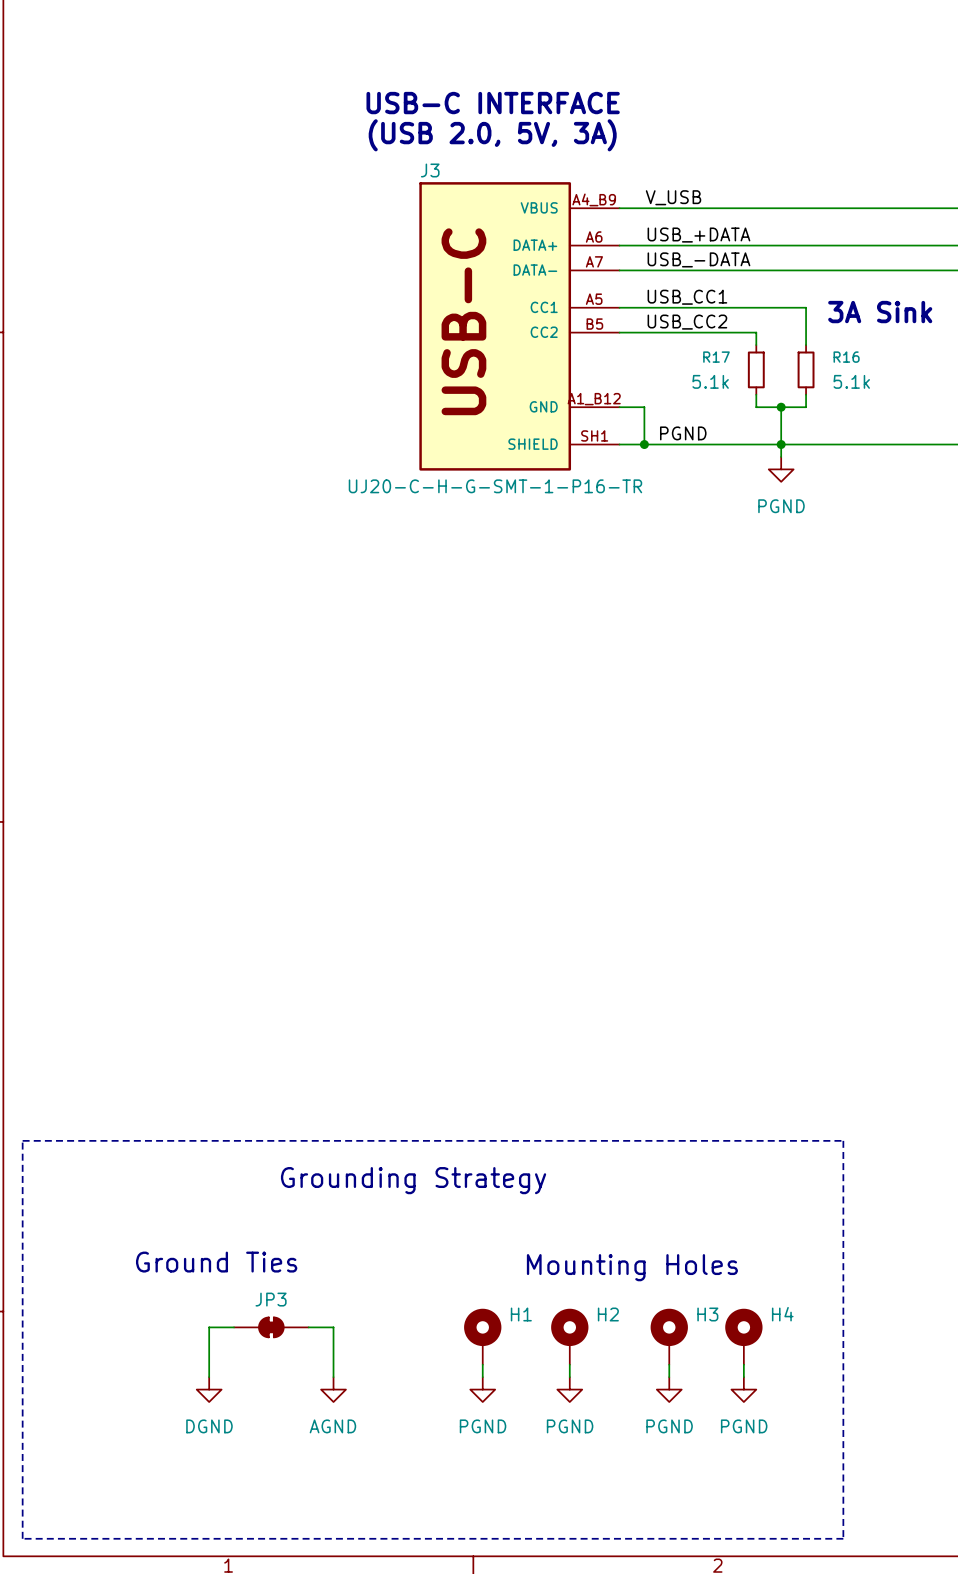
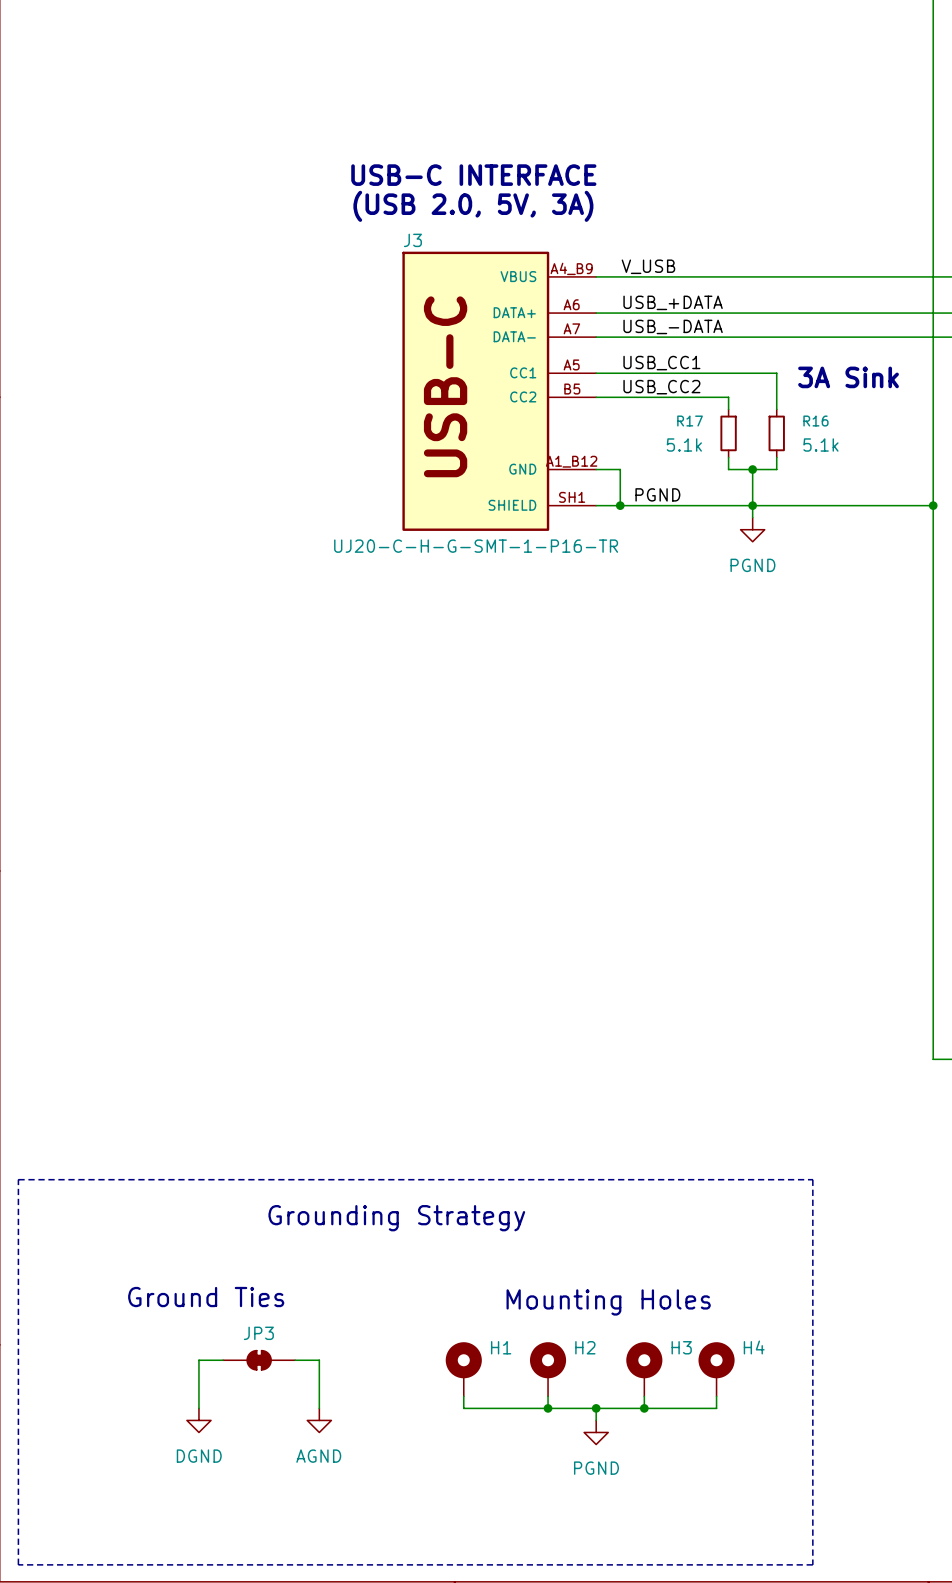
wire: none -> (463, 1408) (716, 1408)
junction: none -> (548, 1408)
wire: none -> (596, 1408) (596, 1420)
junction: none -> (596, 1408)
junction: none -> (644, 1408)
power symbol: PGND (482, 1389) -> none
power symbol: PGND (569, 1389) -> none
power symbol: PGND (669, 1389) -> none
power symbol: PGND (743, 1389) -> none
power symbol: none -> PGND (596, 1432)

